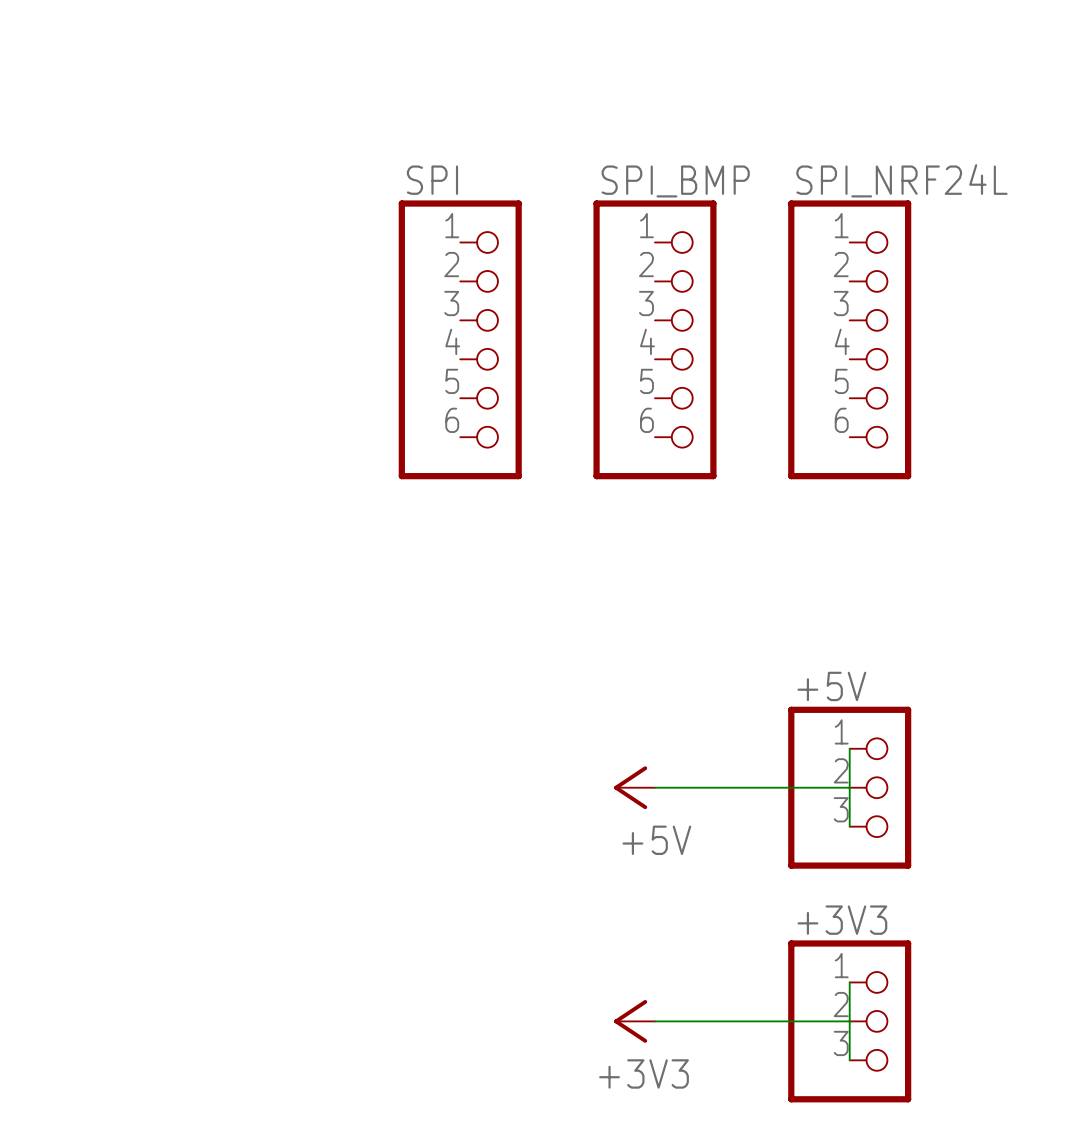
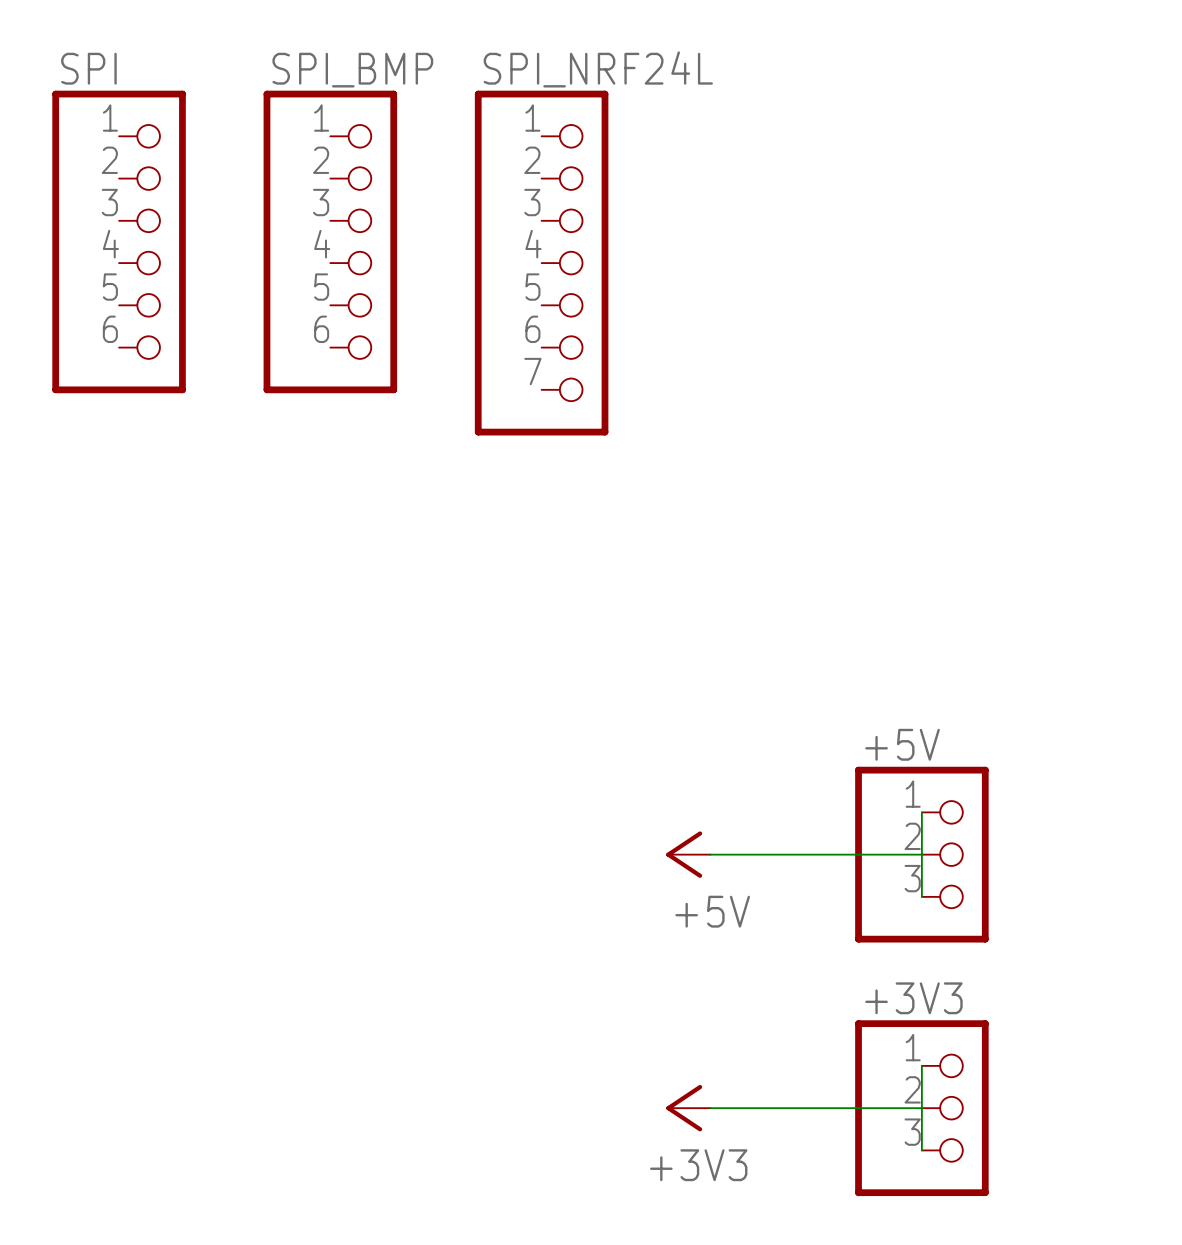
SPI_NRF24L symbol: [788, 200, 912, 480] -> [474, 90, 609, 436]
SPI position: (460, 339) -> (119, 241)
SPI_BMP position: (654, 339) -> (330, 241)

